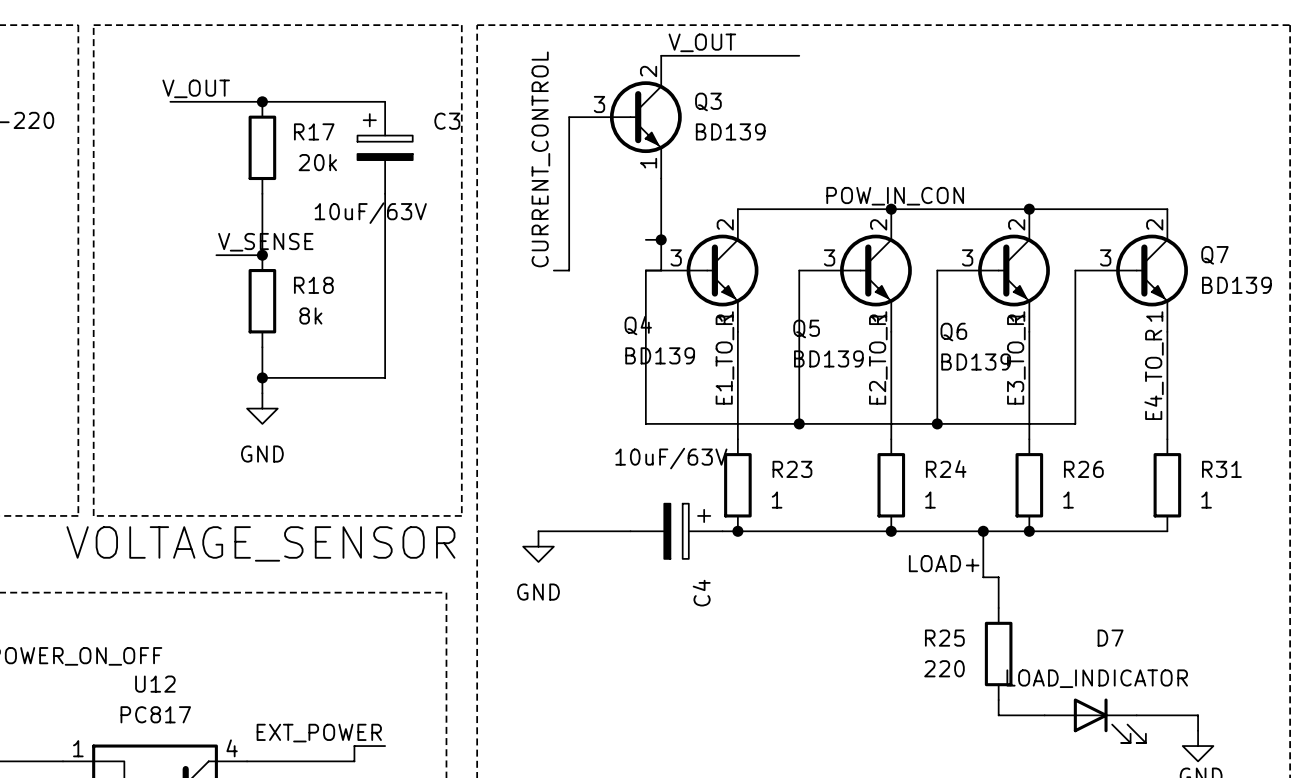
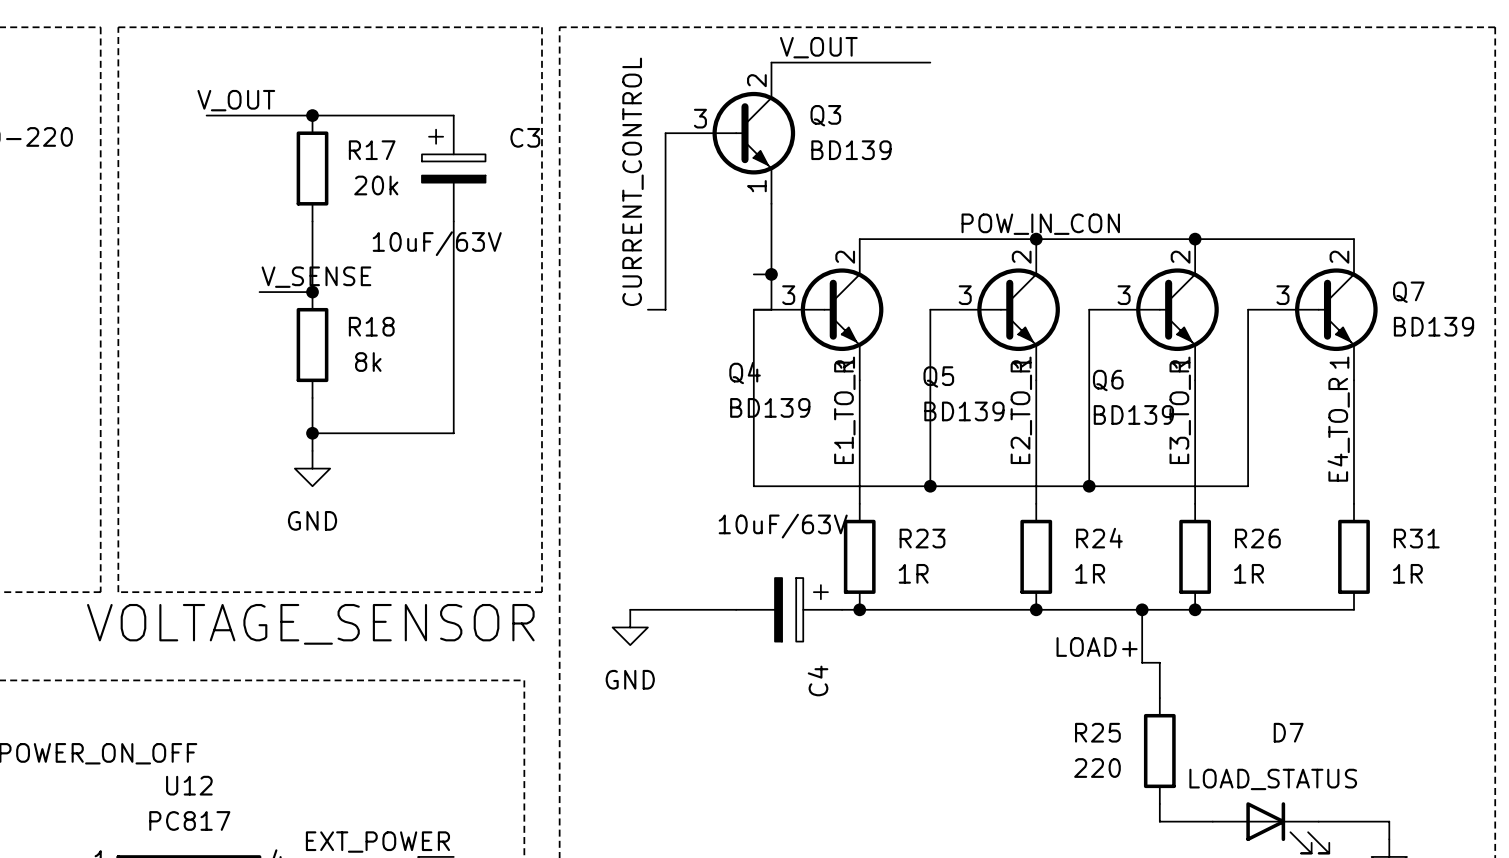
R23 value: 1 (777, 500) -> 1R (913, 573)
R24 value: 1 (930, 500) -> 1R (1090, 573)
R26 value: 1 (1068, 500) -> 1R (1249, 573)
R31 value: 1 (1206, 500) -> 1R (1407, 573)
D7 value: LOAD_INDICATOR (1097, 678) -> LOAD_STATUS (1273, 779)

